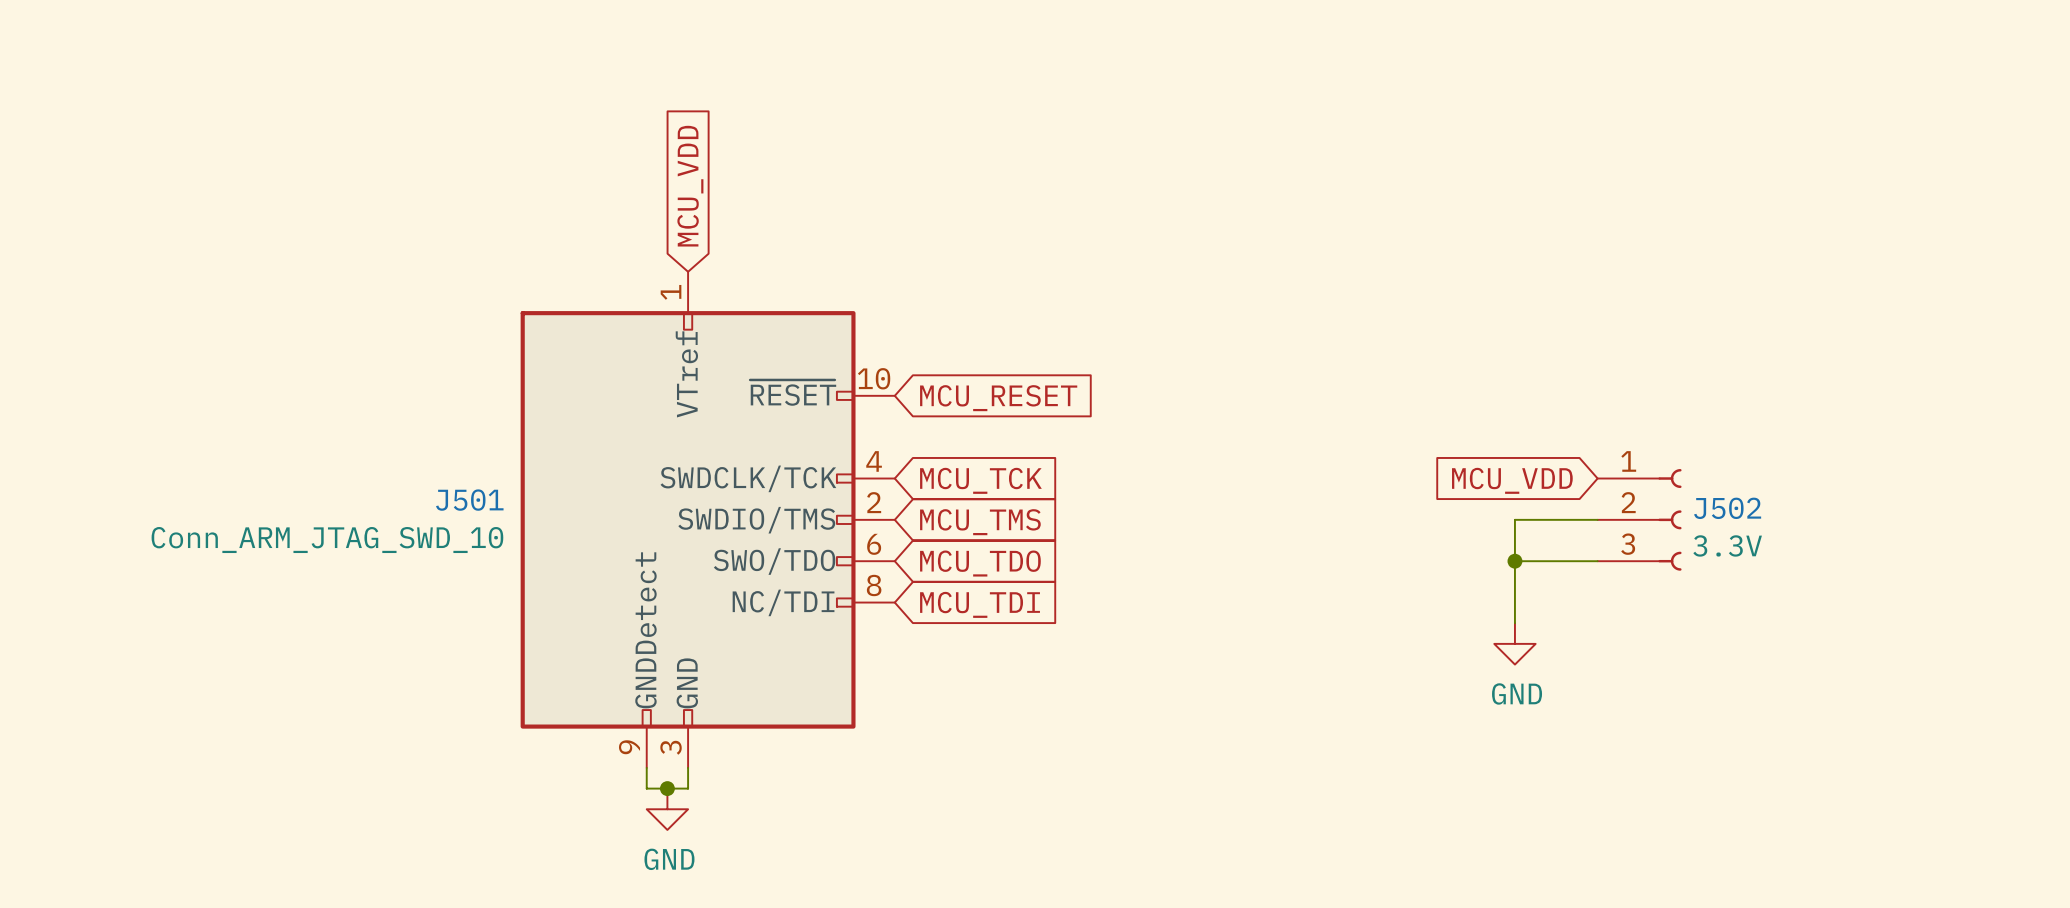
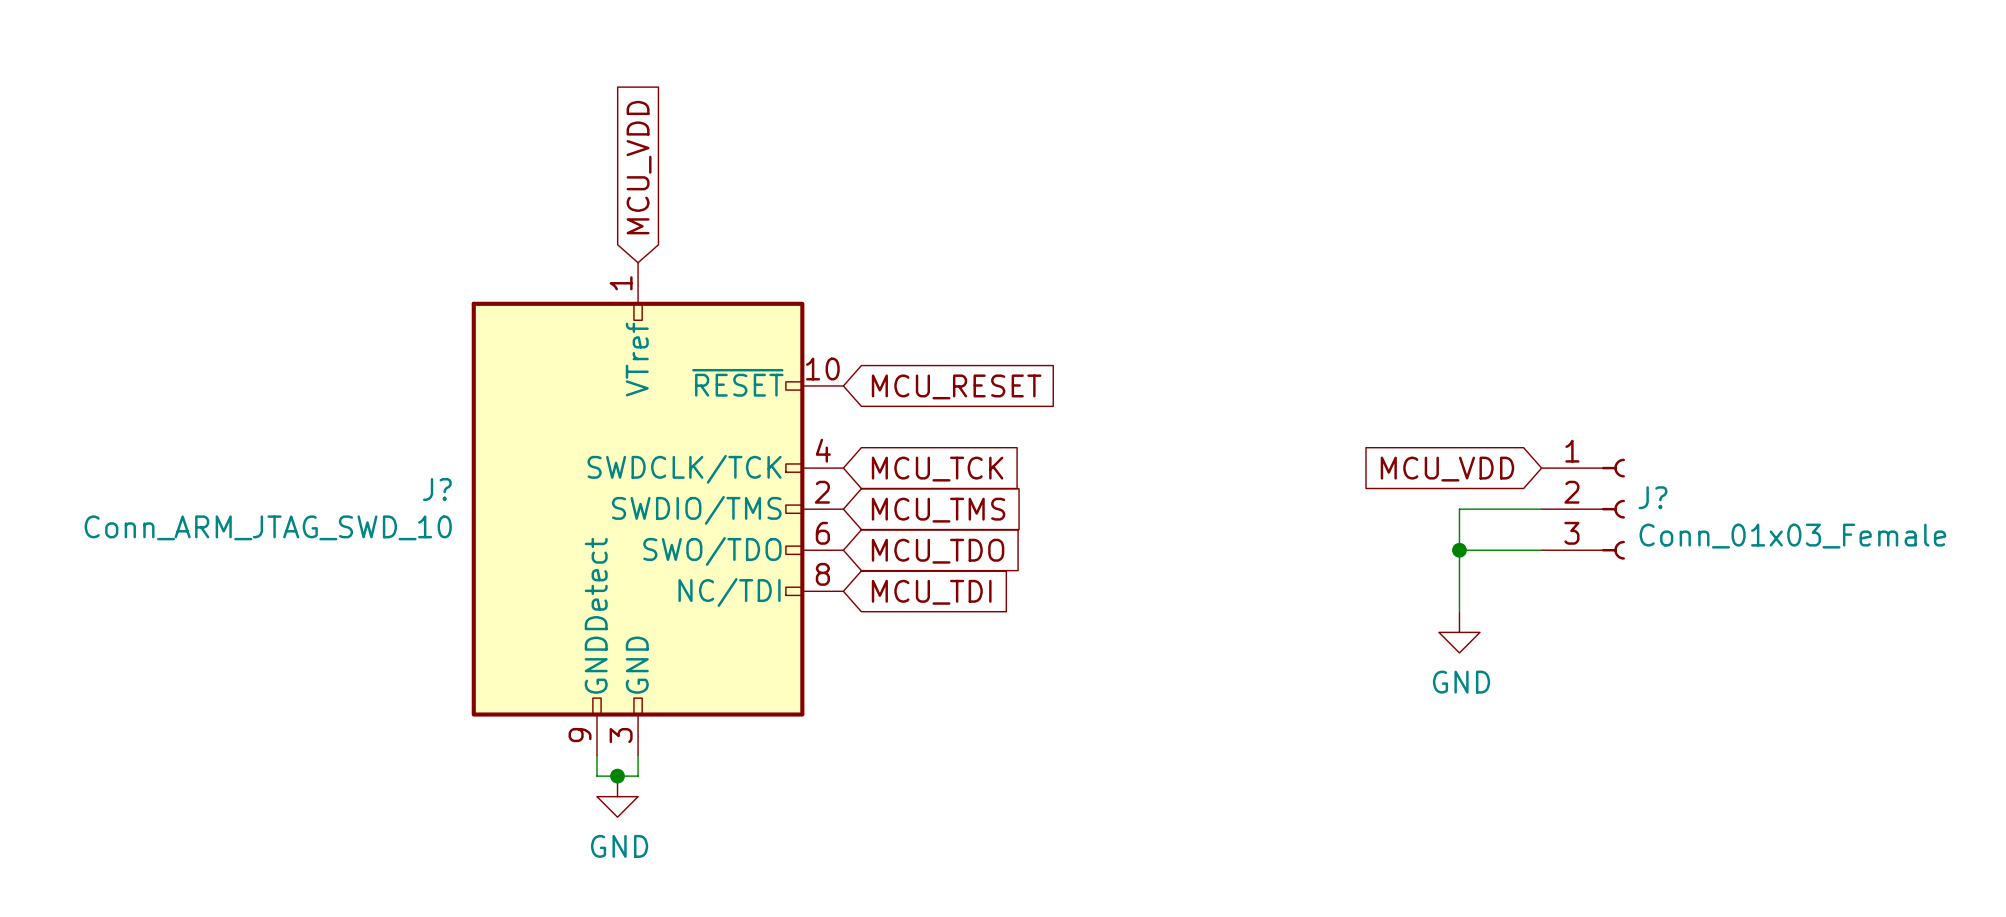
J501 name: J501 (469, 500) -> J? (437, 489)
J502 name: J502 (1727, 508) -> J? (1653, 497)
J502 value: 3.3V (1727, 545) -> Conn_01x03_Female (1792, 536)

